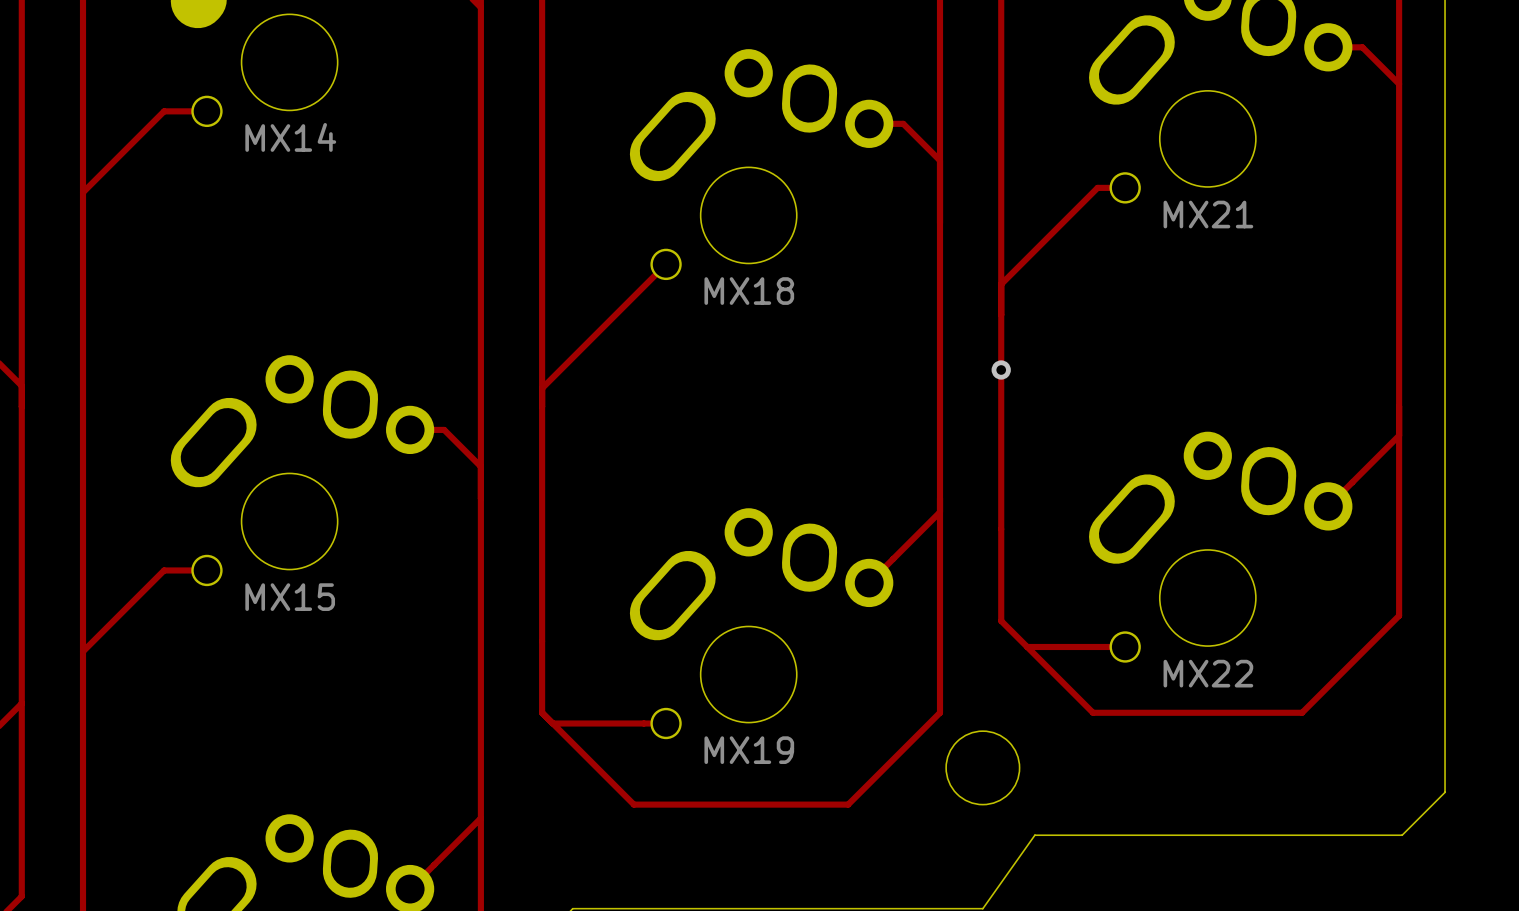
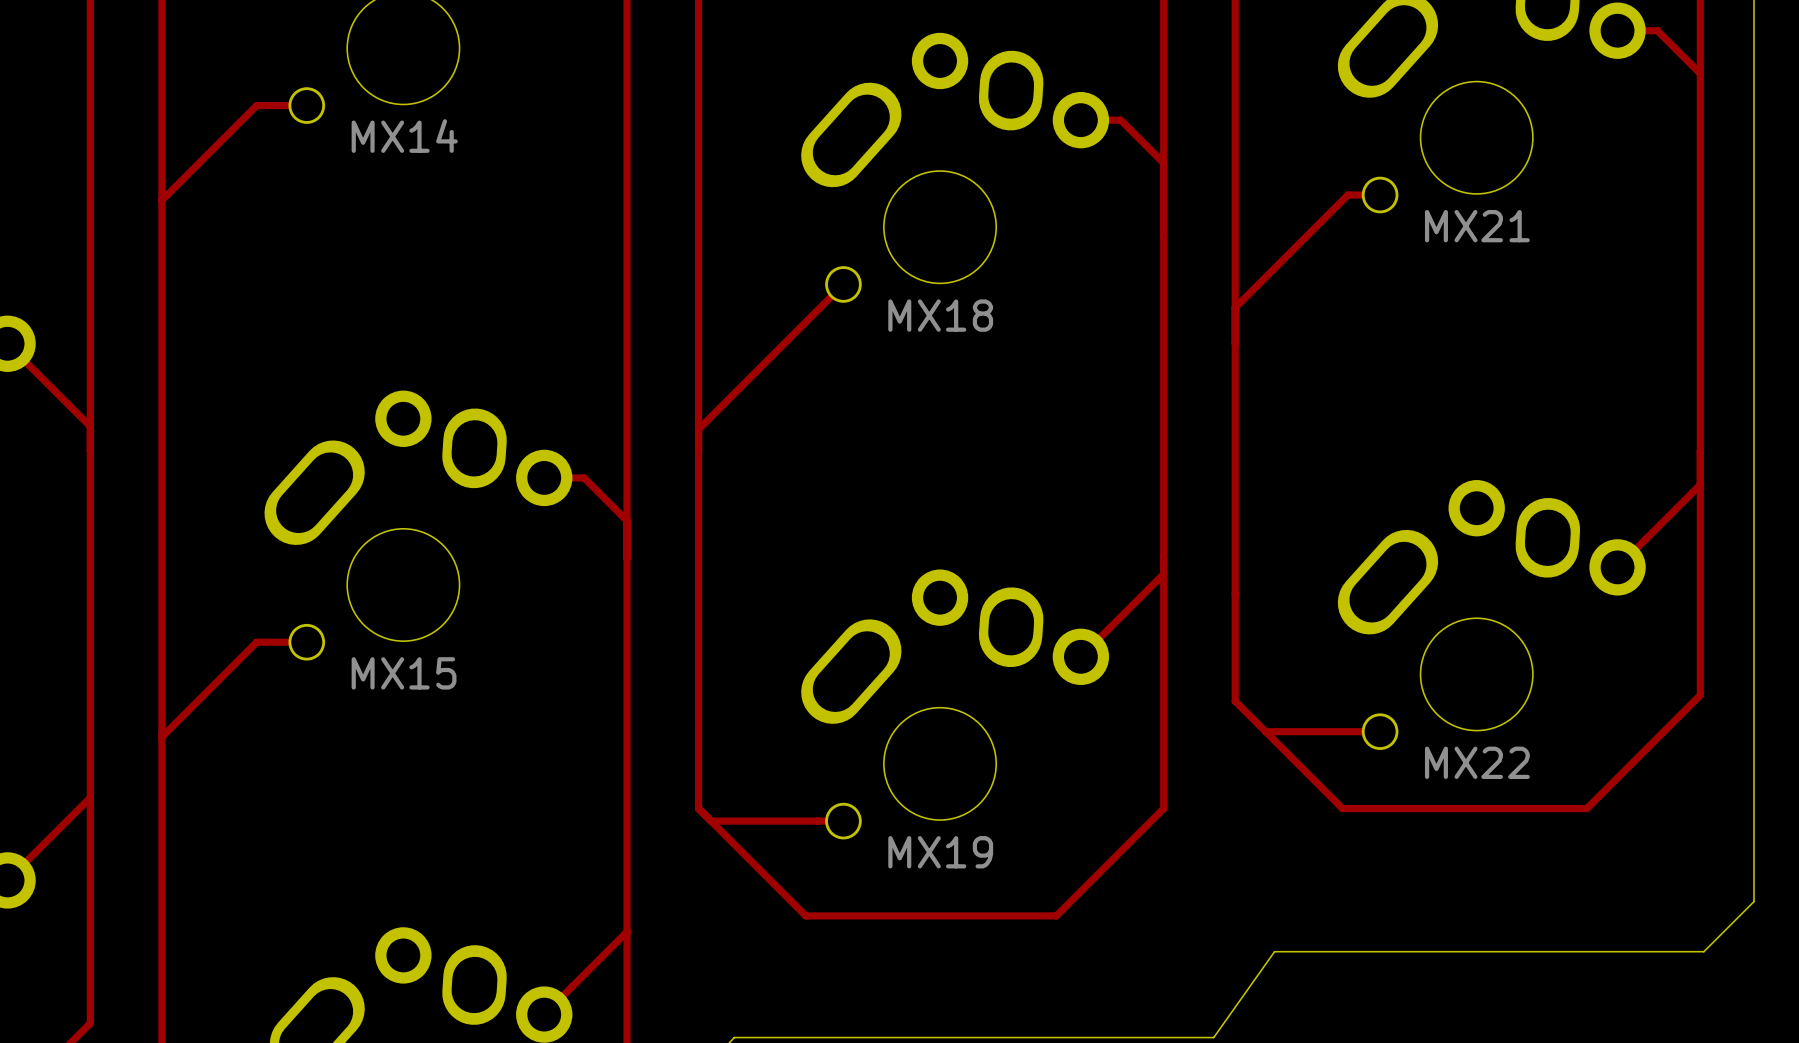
via: (1001, 369) -> none
round board edge: [945, 730, 1021, 806] -> none

